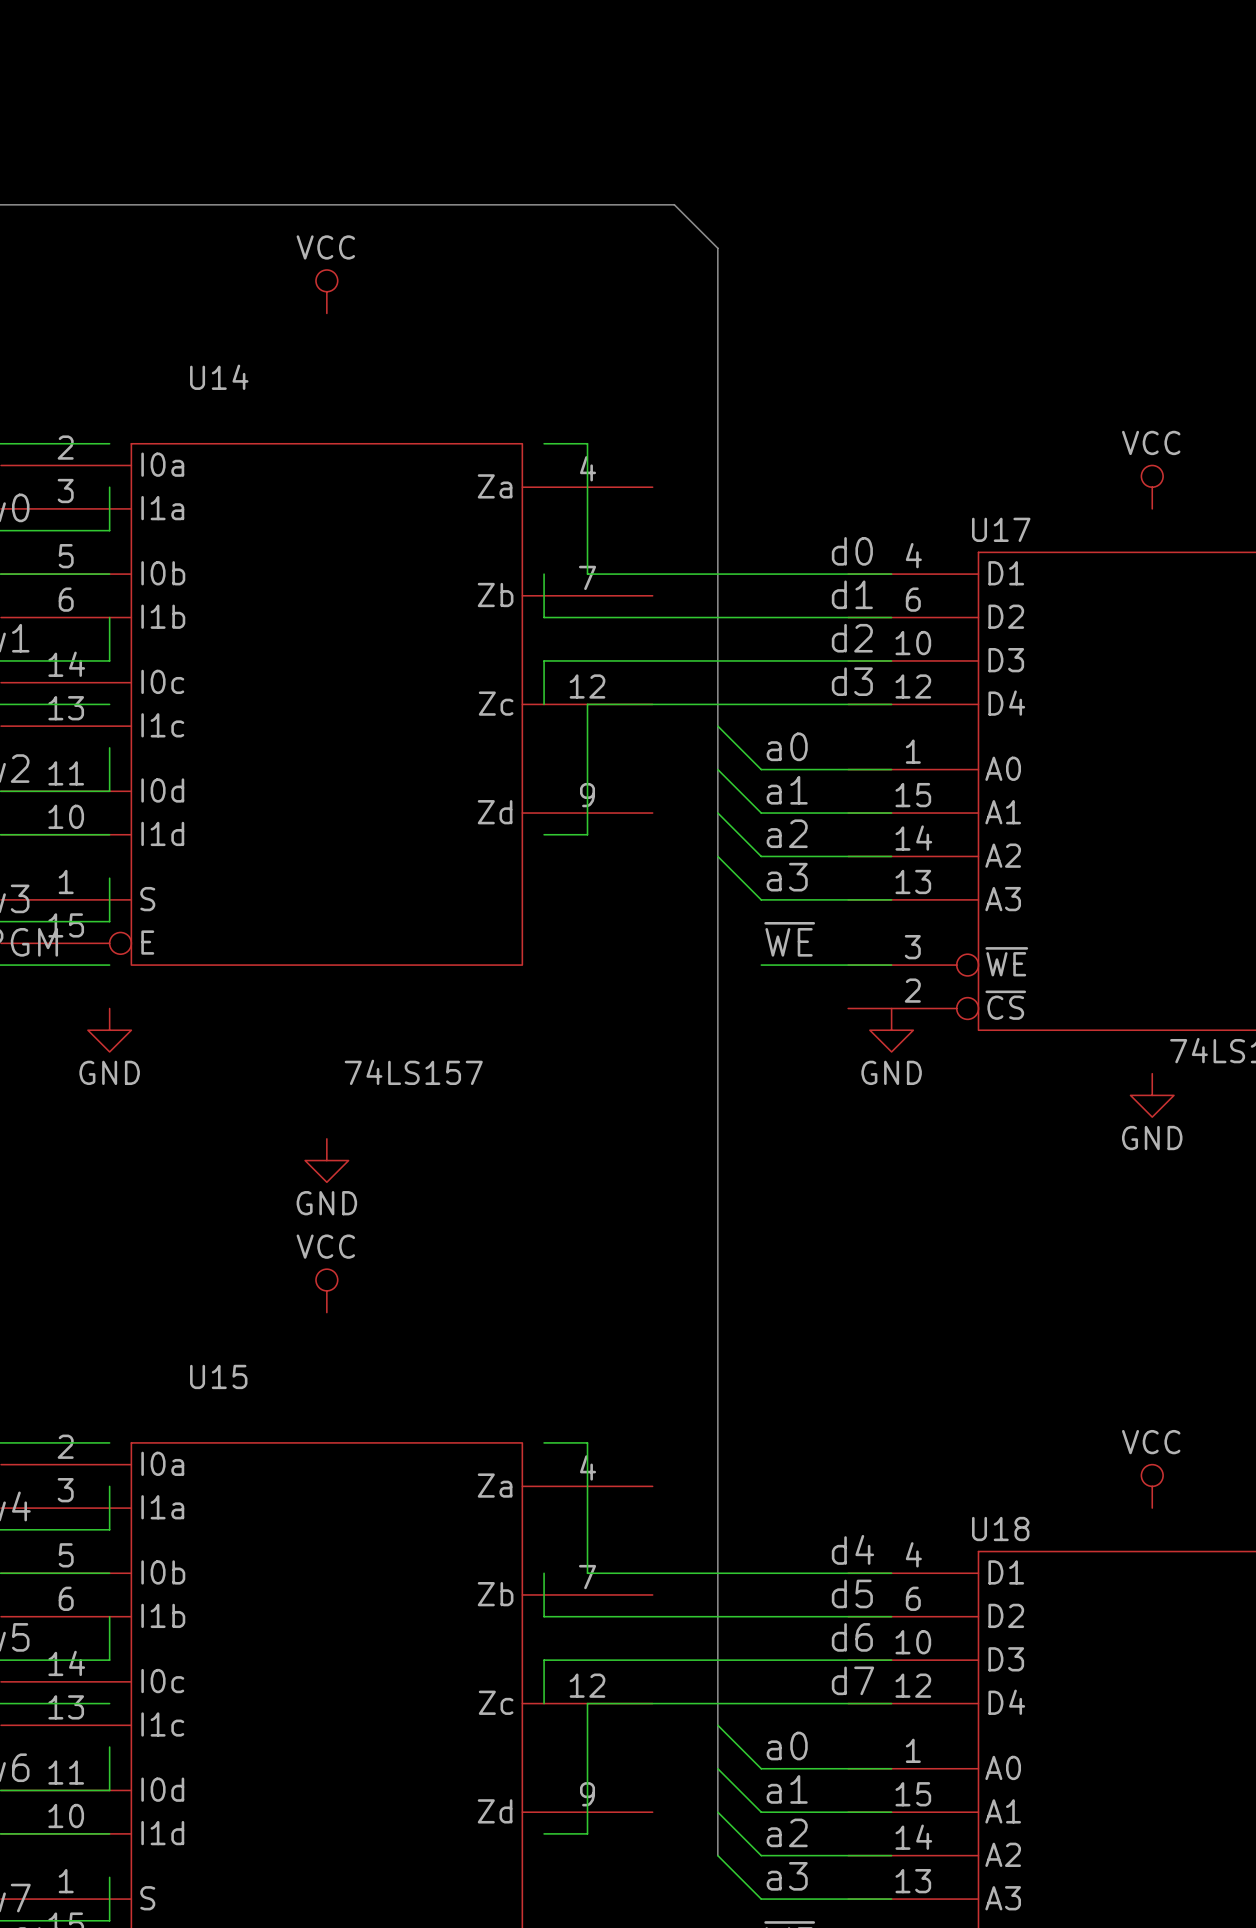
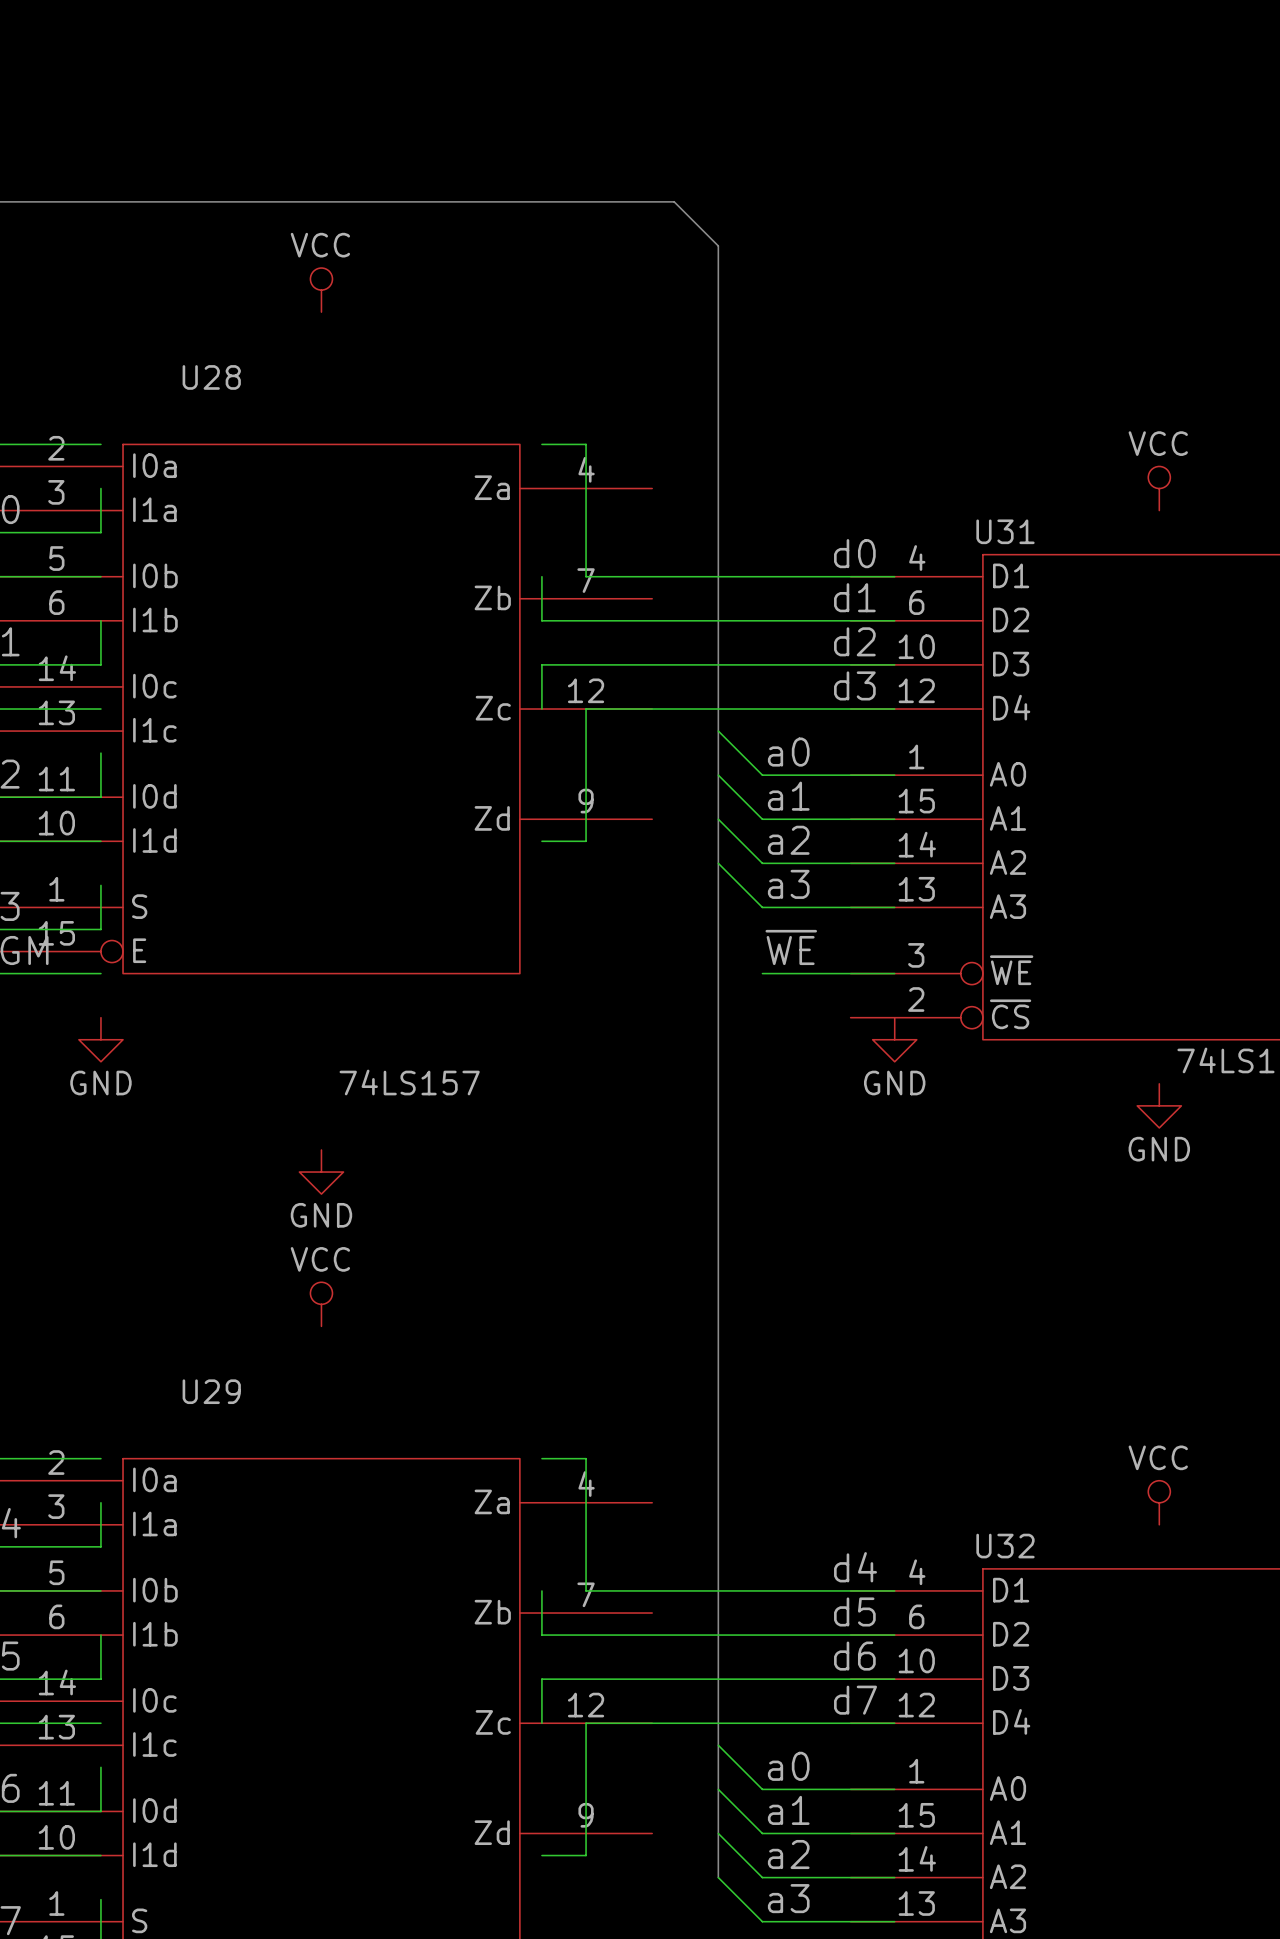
U14 name: U14 (219, 377) -> U28 (211, 377)
U17 name: U17 (1001, 529) -> U31 (1005, 531)
U15 name: U15 (218, 1376) -> U29 (211, 1391)
U18 name: U18 (1000, 1529) -> U32 (1005, 1546)

